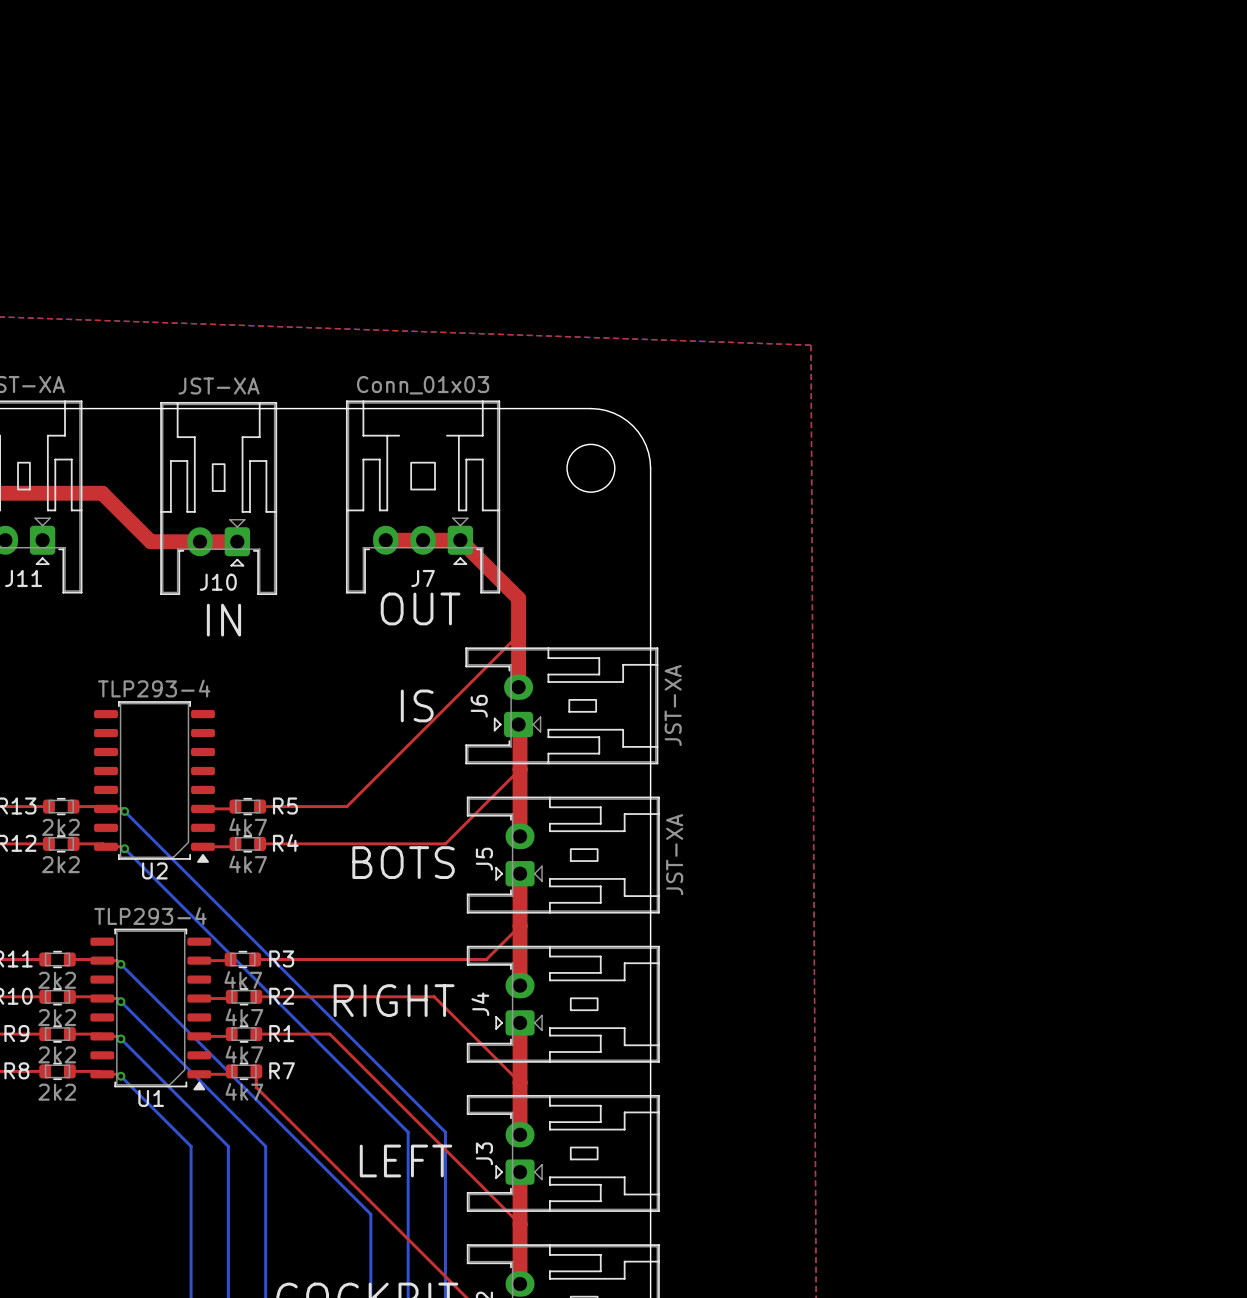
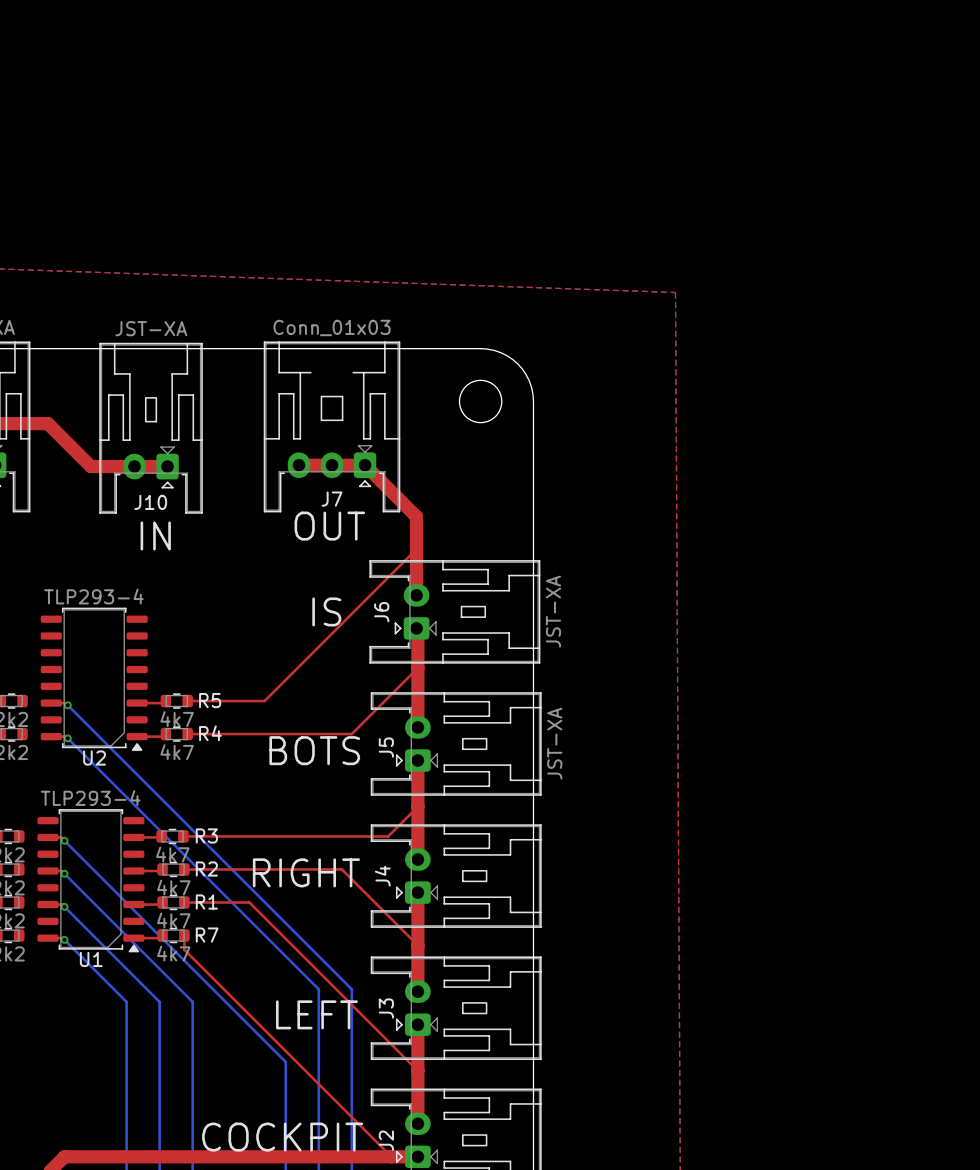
top track: (73, 806) (103, 806) (106, 808) -> none
top track: (73, 843) (103, 843) (106, 846) -> none
top track: (69, 959) (102, 960) -> none
top track: (69, 996) (100, 996) (102, 998) -> none
top track: (69, 1034) (99, 1034) (102, 1036) -> none
top track: (69, 1071) (99, 1071) (102, 1074) -> none

